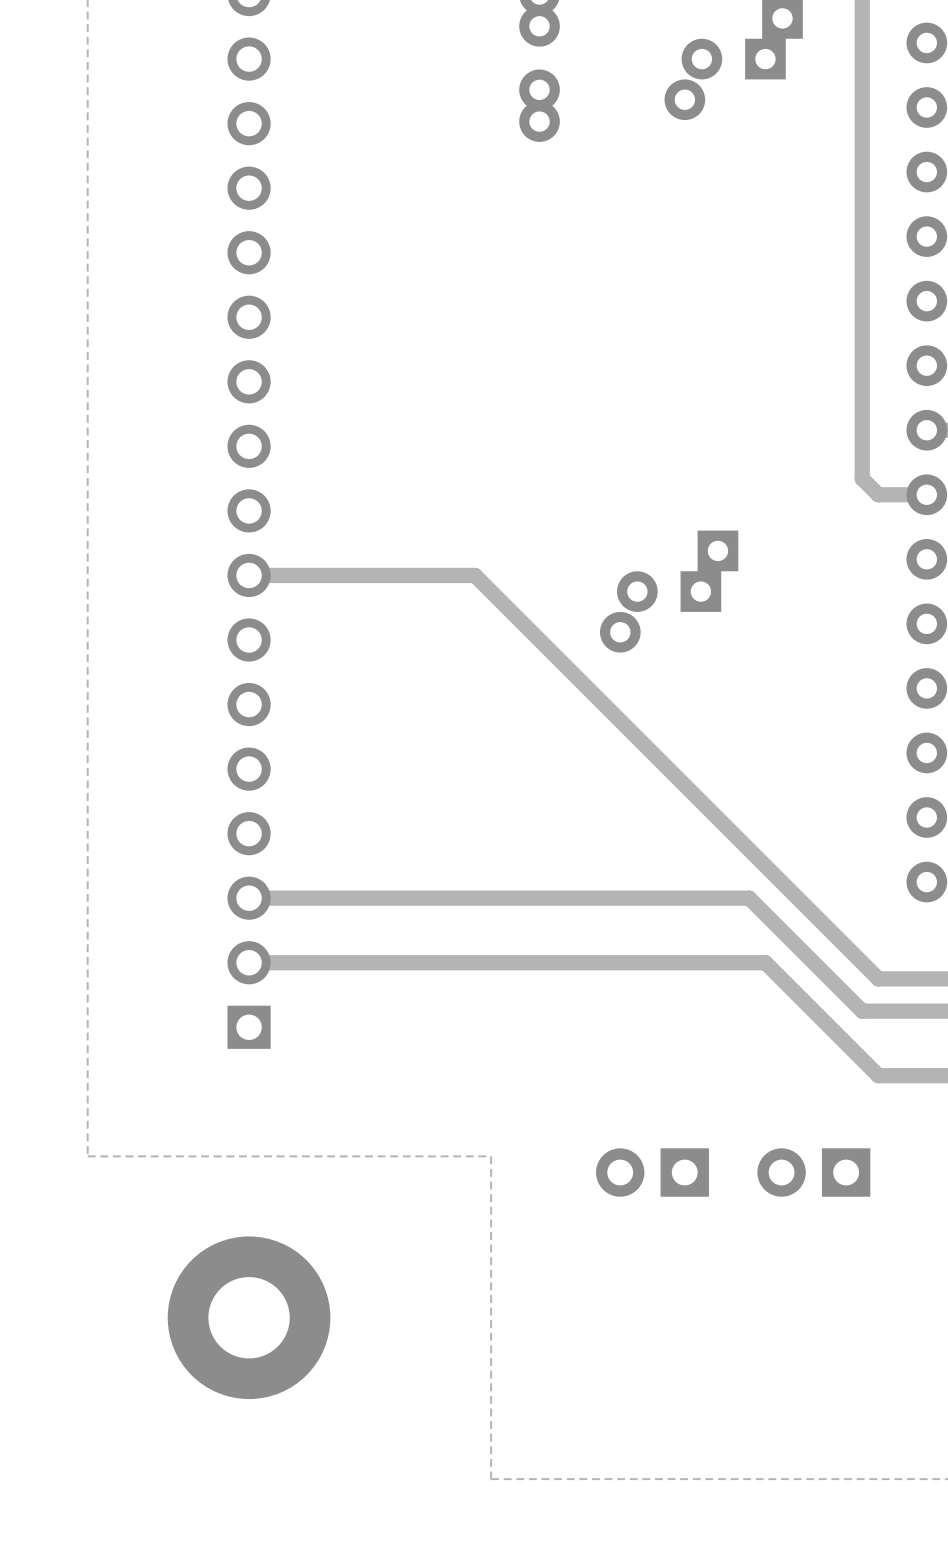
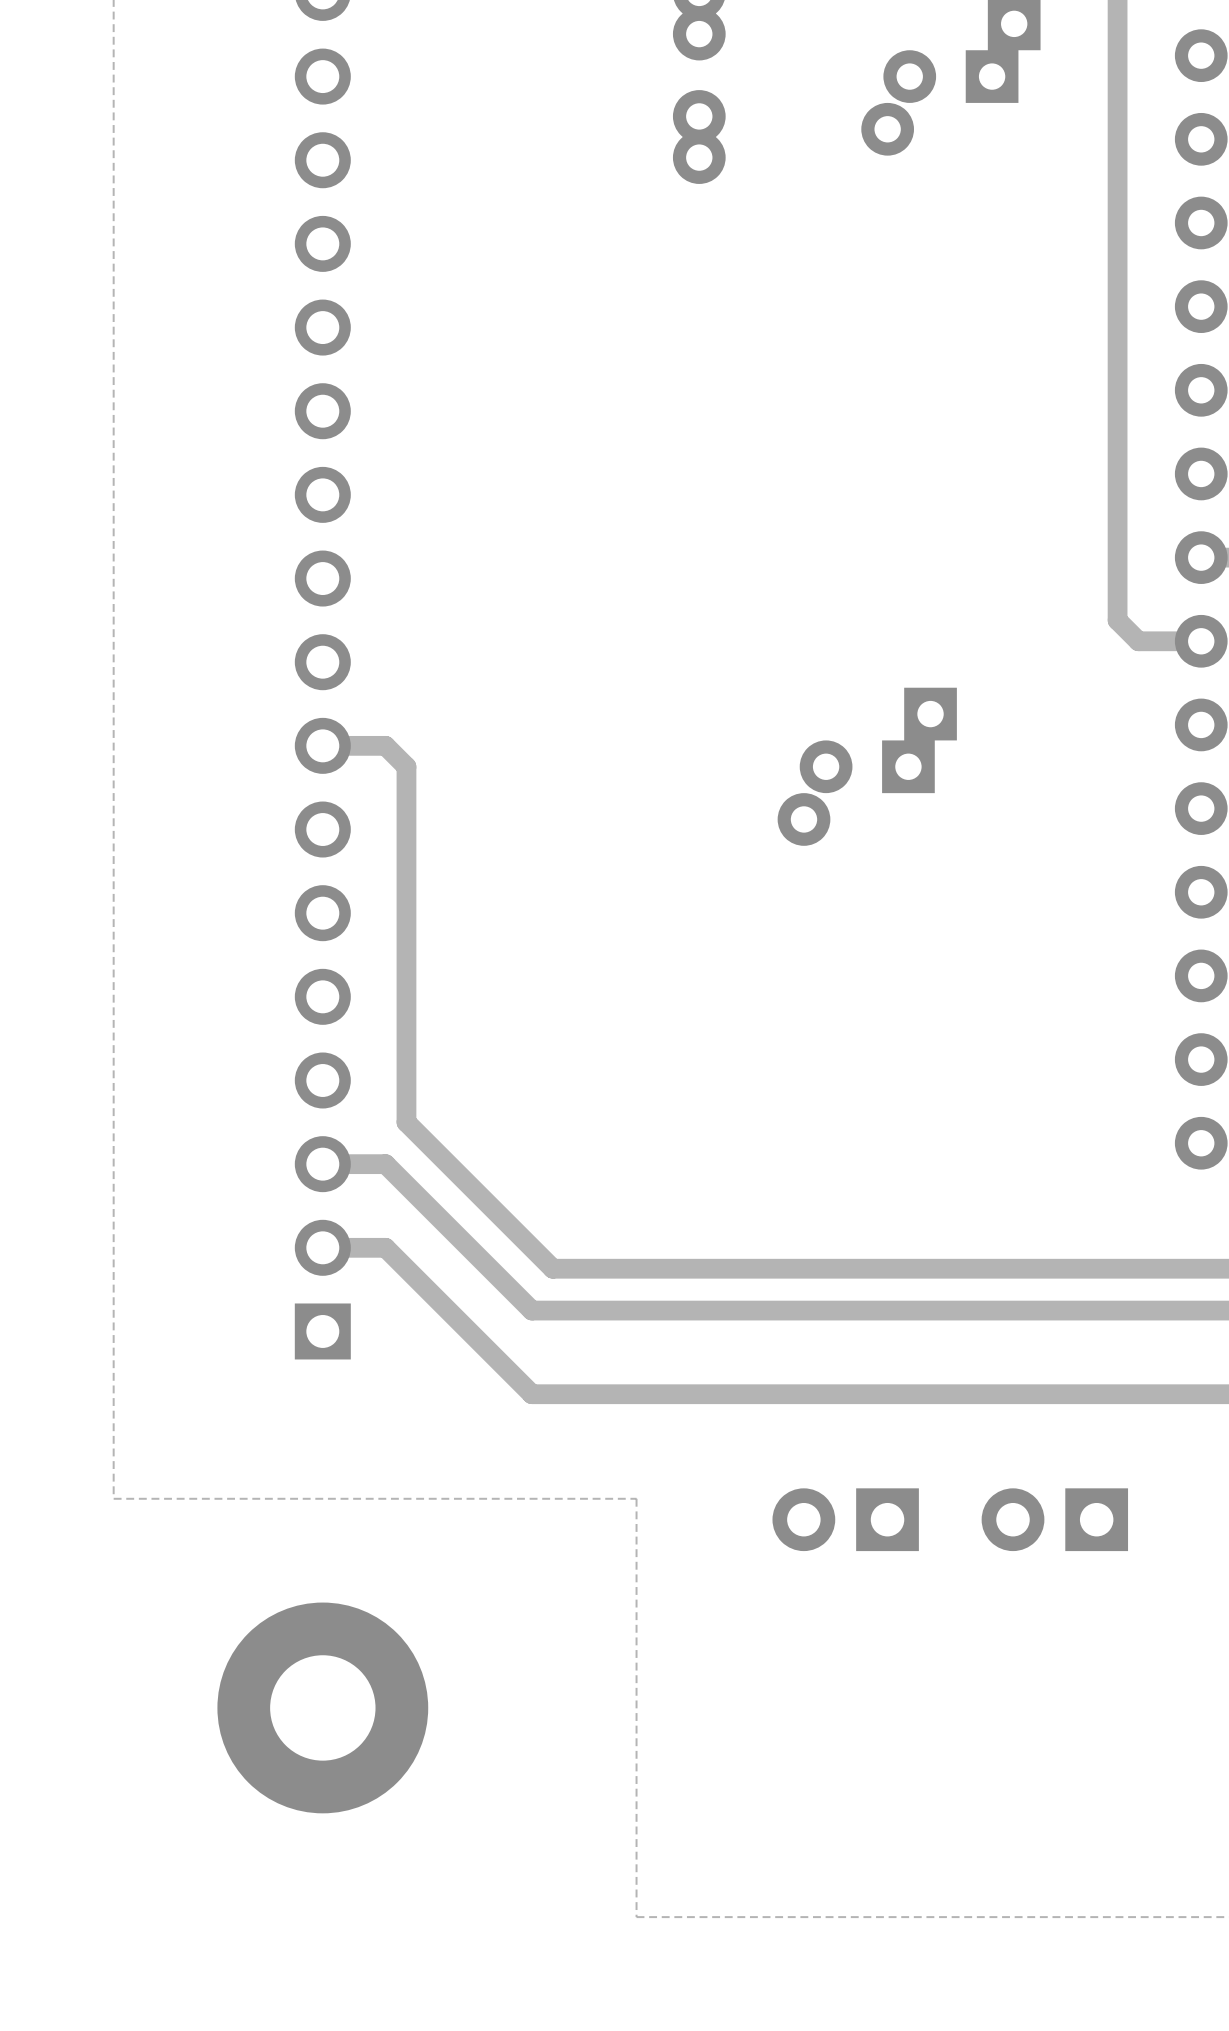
track: (297, 575) (474, 575) (878, 978) -> (385, 745) (406, 766) (406, 1122) (552, 1268) (1138, 1268)
track: (297, 898) (749, 898) (862, 1011) -> (385, 1164) (531, 1310) (1117, 1310)
track: (297, 962) (765, 962) (878, 1075) -> (385, 1247) (531, 1394) (1138, 1394)

